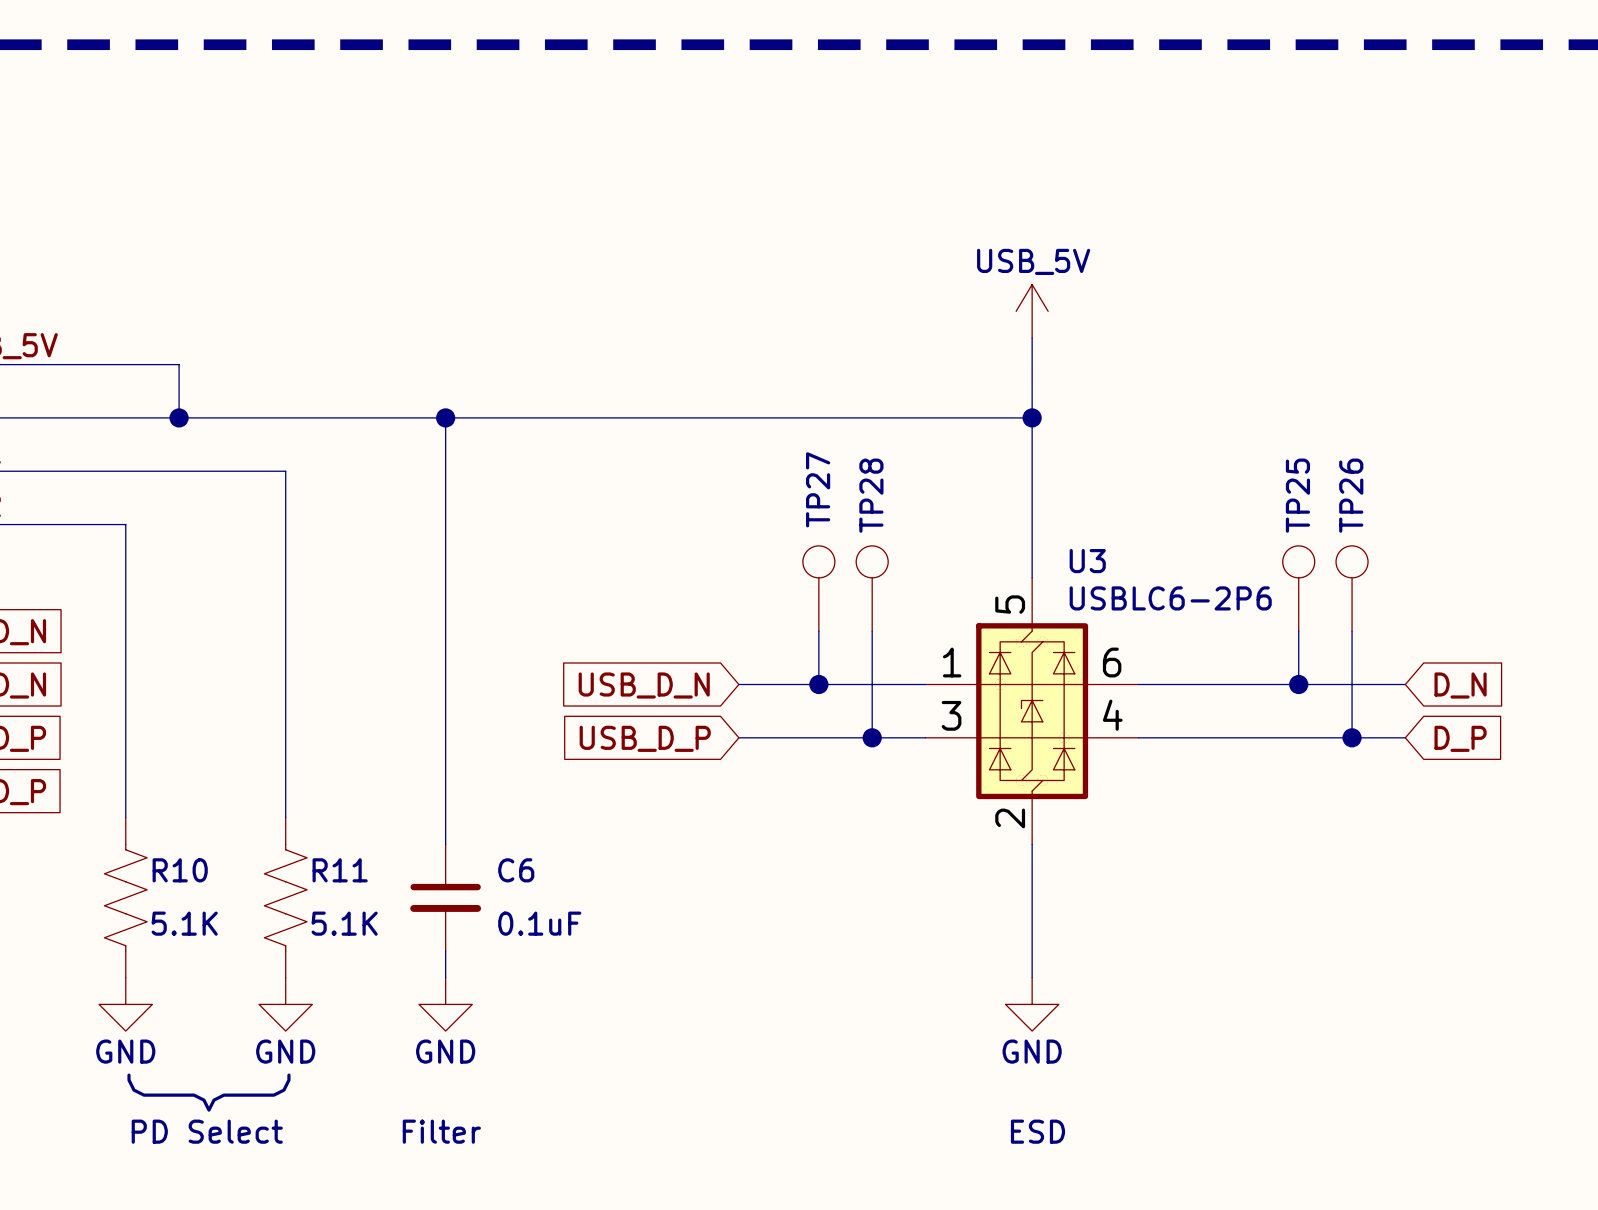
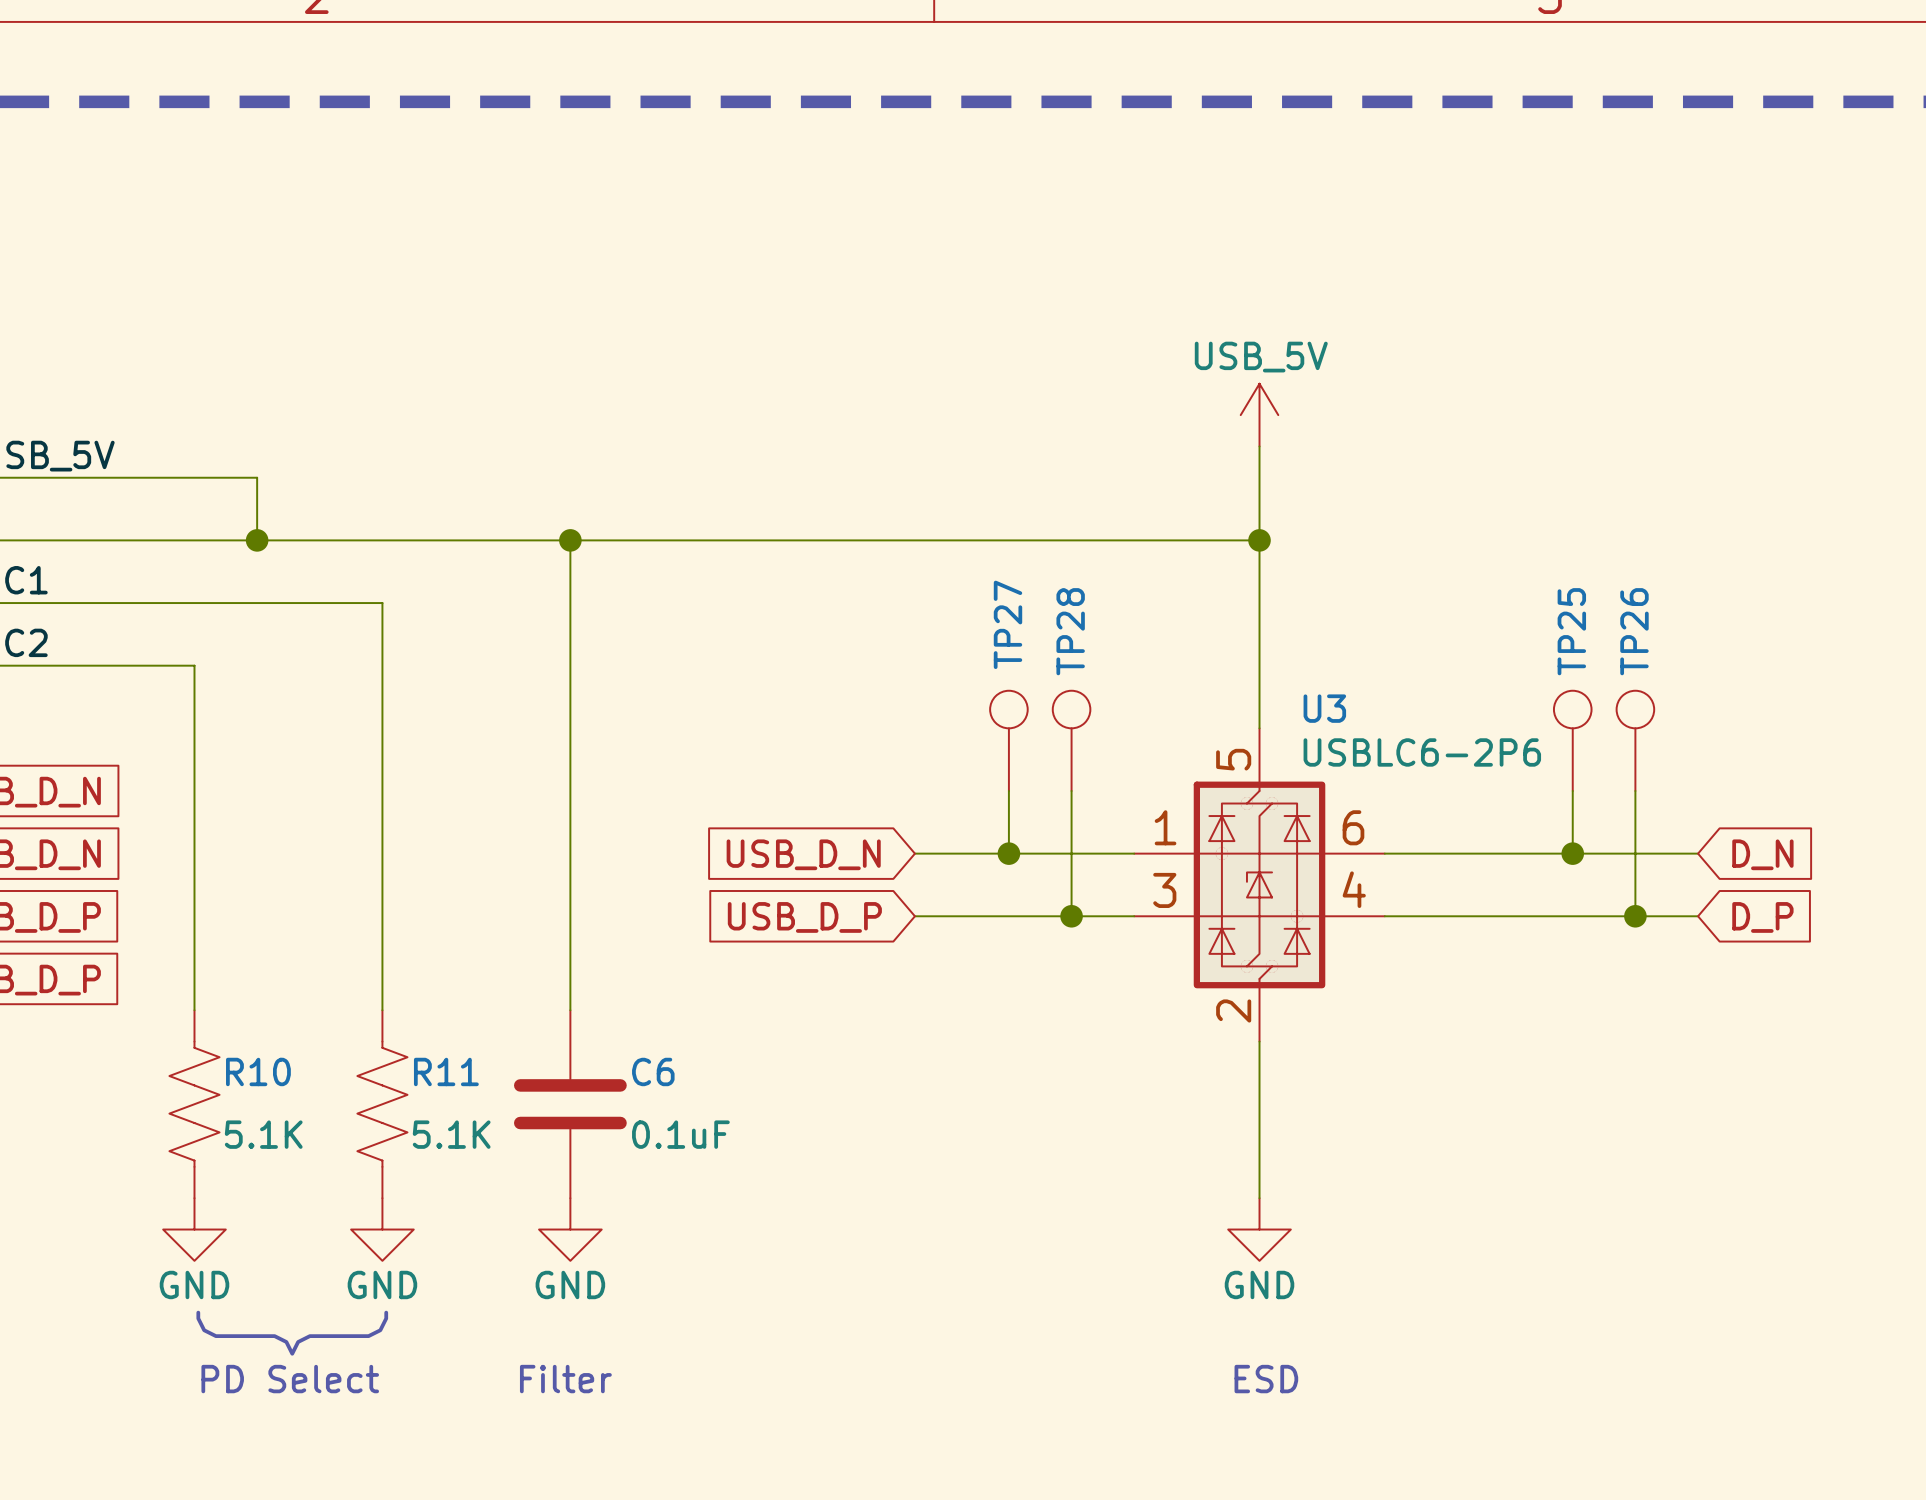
C6 symbol: [410, 844, 482, 952] -> [513, 1010, 627, 1199]

